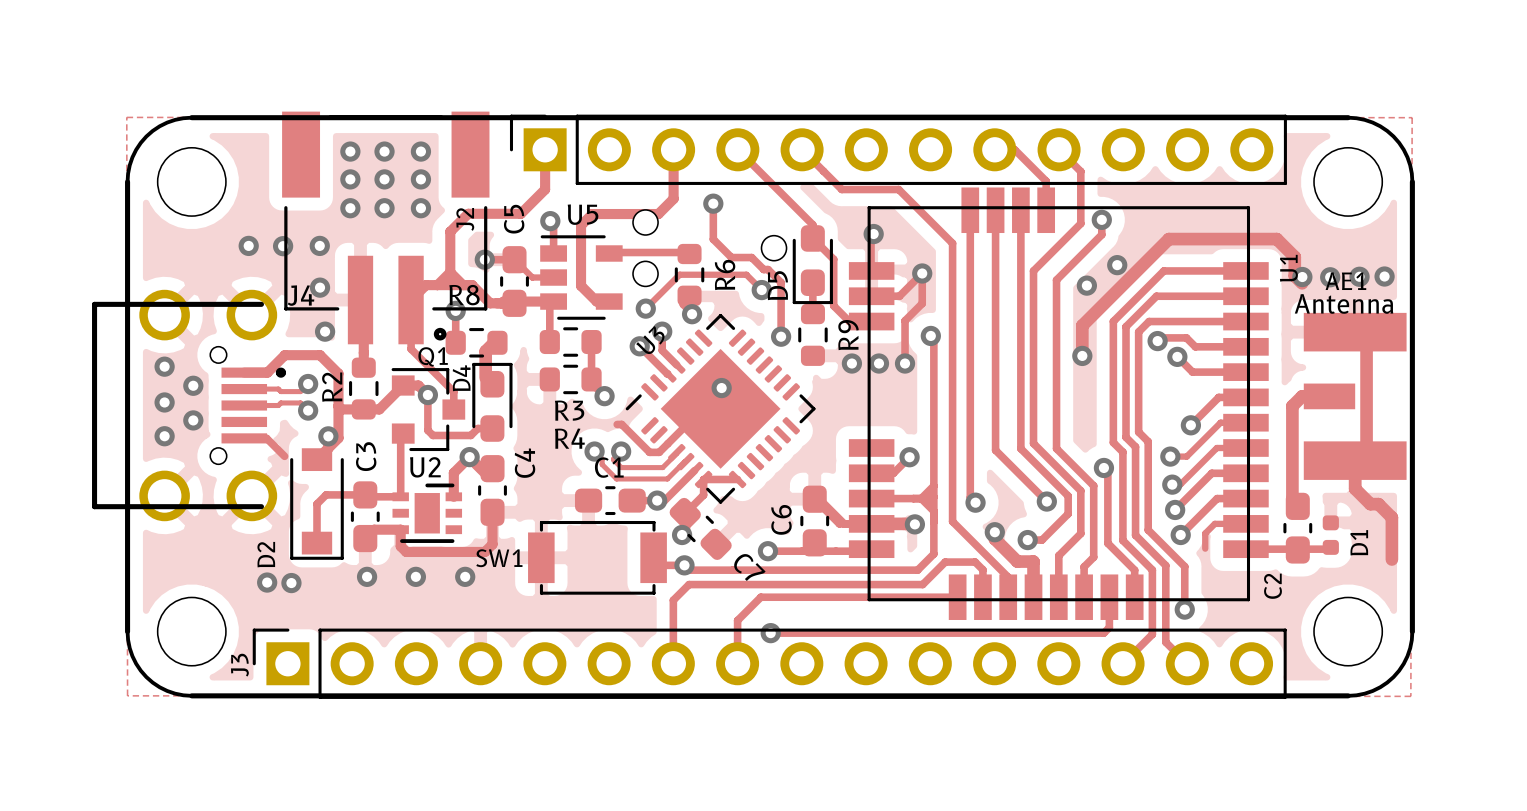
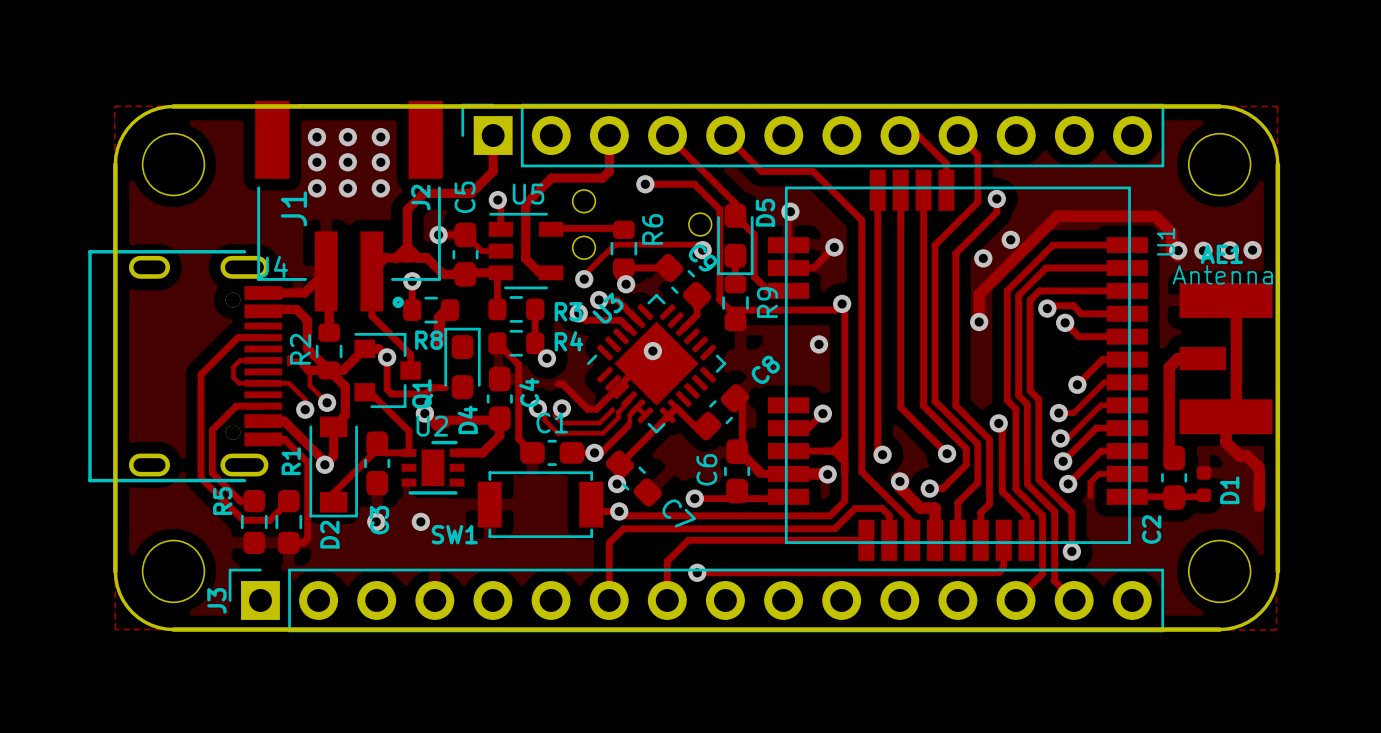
track: (673, 189) (673, 198) (658, 214) (592, 214) -> (609, 171) (602, 178) (551, 178) (535, 193)
track: (713, 203) (713, 239) (731, 257) (751, 257) (781, 282) (781, 336) -> (645, 184) (694, 184) (719, 209) (719, 299) (730, 310) (835, 310) (842, 303)
via: (248, 245) -> none
via: (319, 245) -> none
via: (283, 246) -> none
track: (922, 273) (922, 303) (905, 320) (905, 363) -> none
R6 name position: R6 (725, 274) -> R6 (652, 229)
D5 name position: D5 (777, 285) -> D5 (765, 212)
via: (320, 287) -> none
track: (761, 290) (746, 274) (679, 274) (645, 308) -> (702, 250) (697, 244) (614, 244) (584, 275) (584, 279)
via position: (761, 290) -> (702, 250)
track: none -> (624, 263) (628, 268) (669, 268)
R8 name position: R8 (464, 295) -> R8 (429, 340)
track: none -> (326, 271) (304, 292) (263, 292)
C9: none -> (683, 281)
U3 footprint: [625, 313, 816, 504] -> [586, 294, 727, 434]
track: none -> (697, 295) (697, 315) (683, 328)
via: (325, 331) -> none
track: (662, 331) (662, 350) (676, 365) -> (599, 300) (617, 300) (637, 320)
via: (781, 336) -> none
U3 name position: U3 (650, 340) -> U3 (608, 308)
track: none -> (276, 309) (296, 309) (307, 320) (307, 348) (345, 386) (345, 415) (333, 426) (333, 455) (324, 464) (324, 461) (284, 421) (263, 421)
track: (647, 353) (667, 373) -> (585, 320) (620, 320) (629, 328)
Q1 name rotation: 0° (433, 356) -> 90° counterclockwise (422, 393)
Q1 name position: Q1 (433, 356) -> Q1 (422, 393)
via: (851, 363) -> none
via: (878, 363) -> none
via position: (905, 363) -> (819, 344)
via: (164, 366) -> none
track: (244, 372) (267, 372) (284, 355) (320, 355) (338, 373) (338, 438) (316, 459) -> none
track: none -> (263, 337) (238, 337) (200, 374) (200, 477) (243, 520) (269, 520) (288, 501)
D4 name position: D4 (461, 378) -> D4 (467, 419)
track: none -> (497, 343) (518, 364) (518, 439) (532, 452)
track: (308, 384) (300, 391) (280, 391) (278, 389) (244, 389) -> none
via: (308, 384) -> none
via: (193, 385) -> none
track: none -> (289, 357) (292, 360) (289, 364)
track: none -> (263, 360) (240, 360) (233, 367) (233, 377) (239, 383) (289, 383) (305, 399) (305, 409)
track: none -> (289, 360) (297, 360) (309, 373) (309, 385) (327, 402)
via: (164, 402) -> none
D4 position: (492, 402) -> (462, 363)
J1: none -> (185, 366)
part: (189, 405) -> none
track: (244, 405) (278, 405) (280, 402) (300, 402) (308, 410) -> none
via: (308, 410) -> none
R3 name position: R3 (569, 410) -> R3 (568, 311)
via: (193, 420) -> none
track: (403, 433) (400, 436) (400, 496) (326, 494) (316, 504) (316, 543) -> (364, 392) (370, 392) (408, 431) (408, 452) (386, 452) (377, 443) (377, 449) (333, 493) (333, 502)
via: (164, 436) -> none
via position: (328, 436) -> (305, 409)
track: (244, 438) (266, 438) (284, 456) -> none
R4 name position: R4 (569, 438) -> R4 (568, 341)
track: none -> (735, 398) (742, 405) (742, 452)
via: none -> (327, 402)
track: none -> (263, 406) (236, 406) (212, 430) (212, 473) (240, 501) (254, 501)
C8: none -> (721, 412)
C3 name position: C3 (366, 456) -> C3 (379, 520)
track: (469, 457) (453, 472) (453, 496) -> none
track: none -> (645, 415) (637, 407) (629, 415) (629, 422) (627, 424)
track: (685, 461) (666, 478) -> (629, 399) (629, 401) (618, 412) (618, 417) (602, 433)
C4 name position: C4 (525, 463) -> C4 (529, 392)
track: none -> (435, 420) (498, 420) (499, 418) (499, 435) (482, 452) (457, 452)
track: (737, 479) (703, 479) (703, 495) -> (707, 426) (694, 426) (675, 407) (636, 447)
track: none -> (263, 439) (284, 439) (307, 462) (307, 538) (303, 542) (288, 542)
C4 position: (492, 490) -> (499, 398)
D2 position: (316, 504) -> (333, 466)
track: (492, 512) (492, 544) (484, 551) (406, 551) (400, 546) (400, 529) (374, 529) (365, 538) -> none
via: none -> (324, 464)
U2 position: (427, 513) -> (433, 467)
C3 position: (365, 516) -> (377, 463)
D2 name position: D2 (266, 554) -> D2 (329, 534)
SW1 name position: SW1 (499, 558) -> SW1 (454, 534)
R5: none -> (254, 522)
R1: none -> (288, 522)
via: (367, 576) -> none
via: (267, 582) -> none
via: (291, 583) -> none

